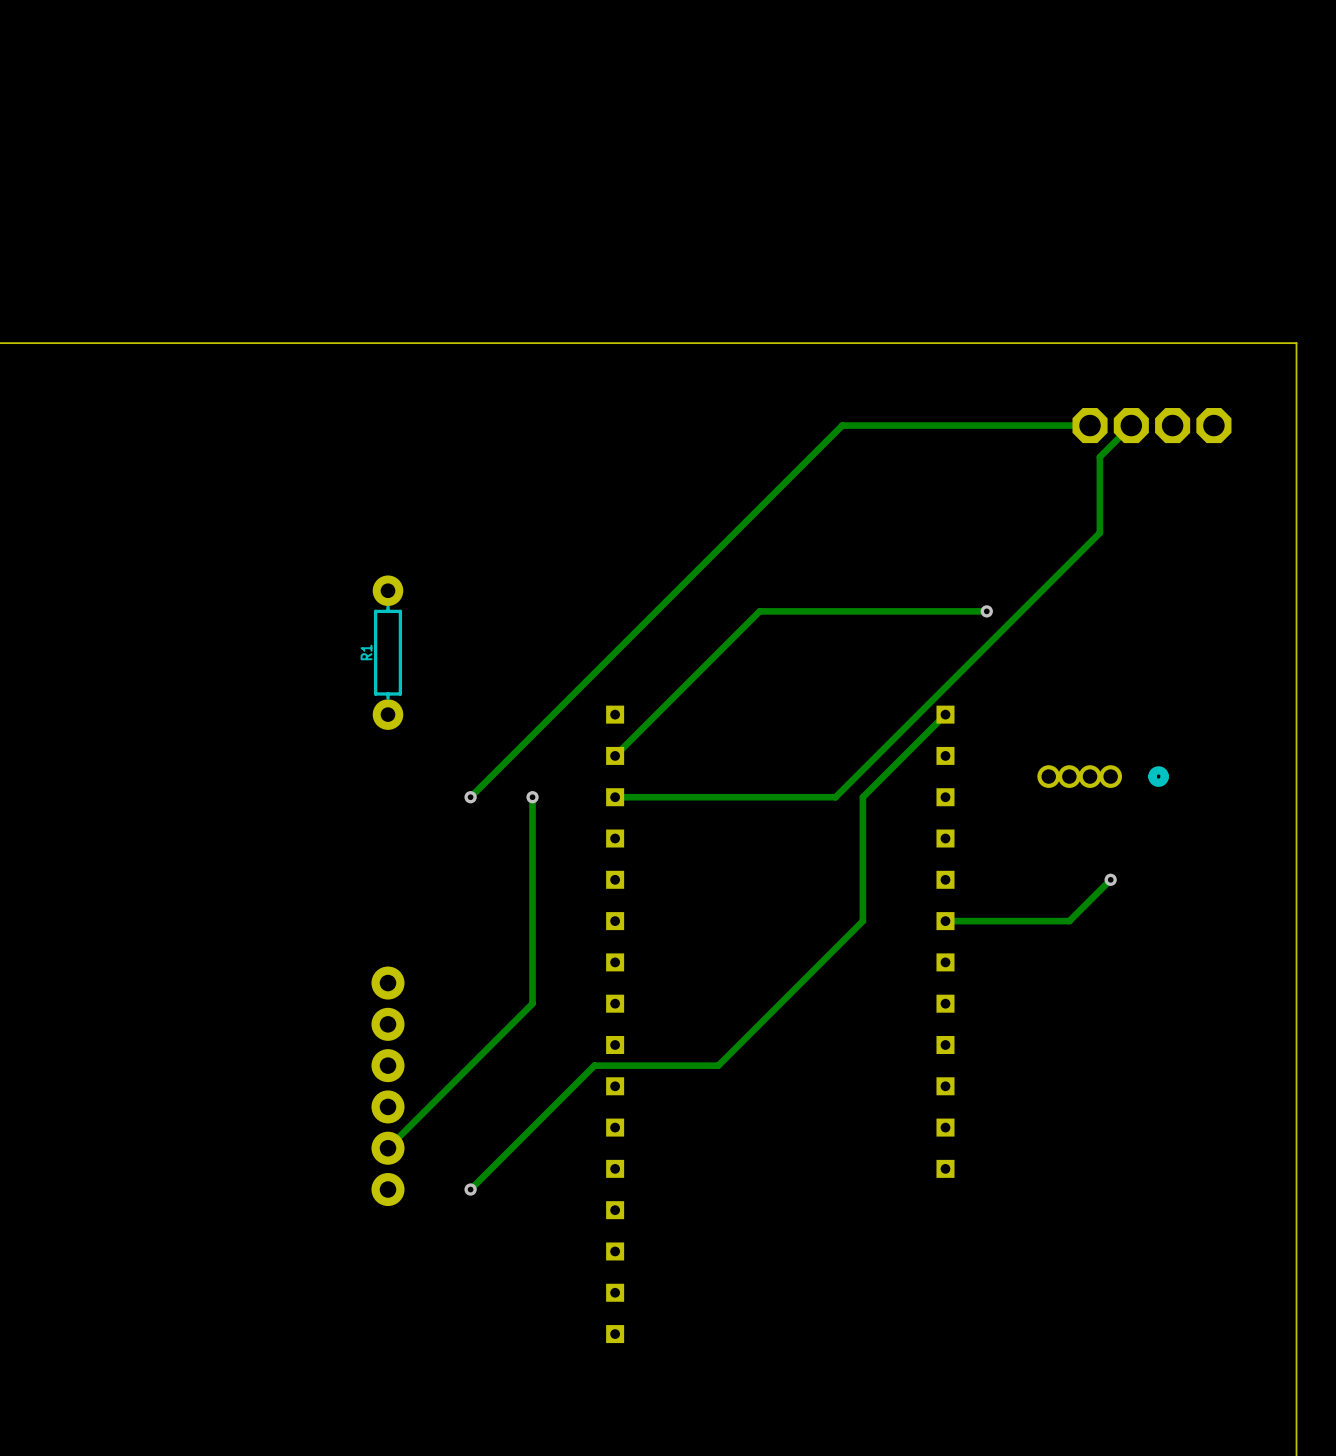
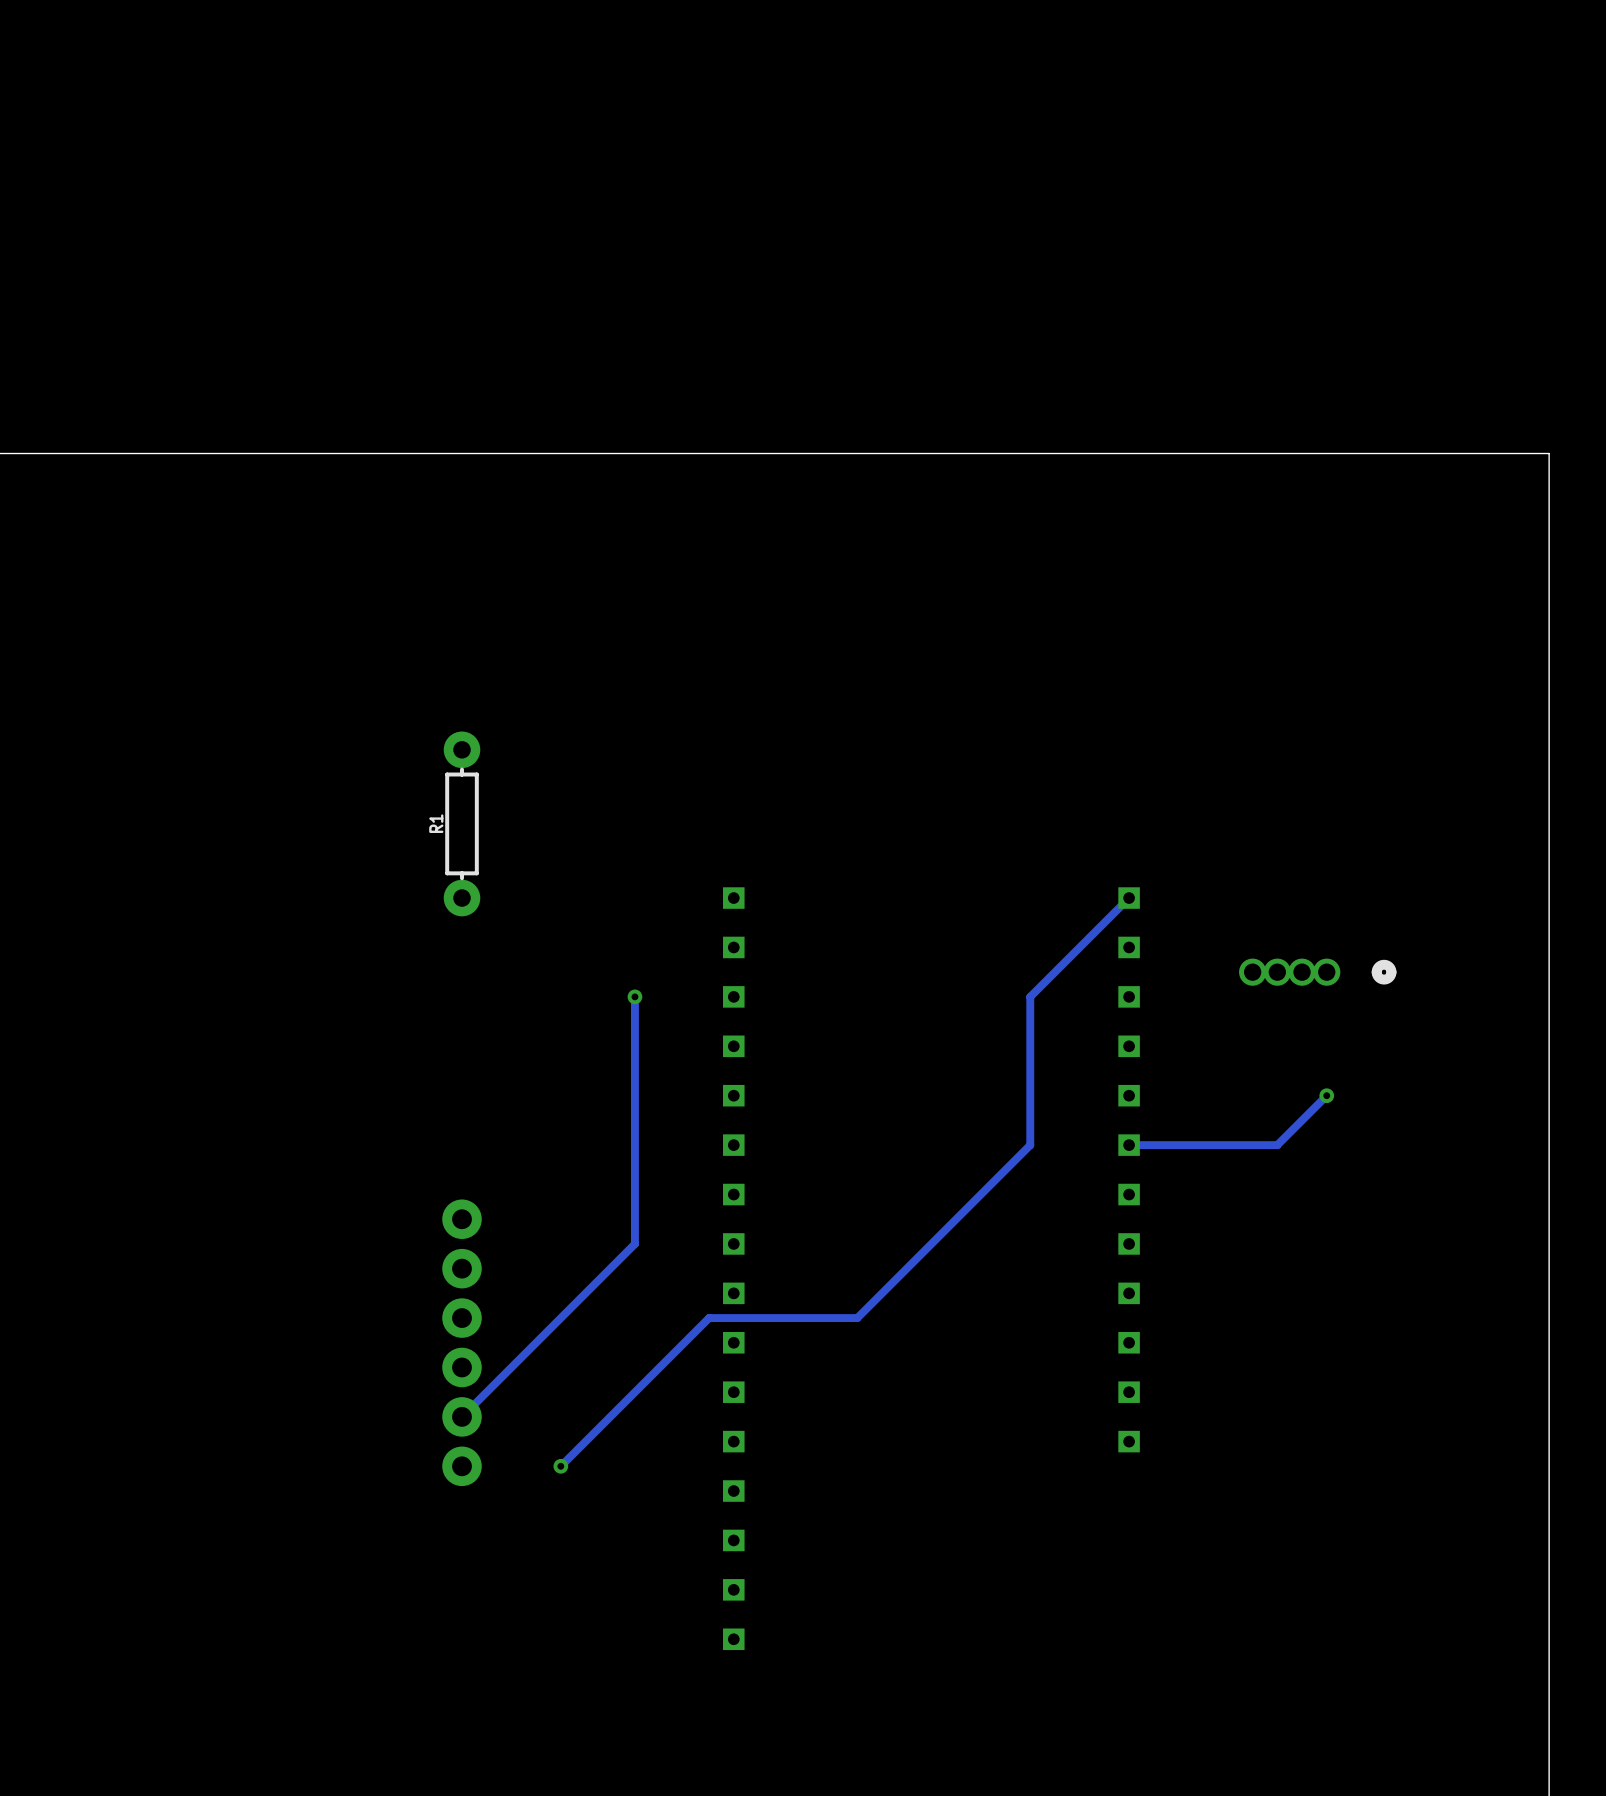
track: (1090, 425) (842, 425) (470, 797) -> none
part: (1090, 425) -> none
track: (1131, 425) (1099, 456) (1099, 532) (835, 797) (615, 797) -> none
part: (1131, 425) -> none
part: (1172, 425) -> none
part: (1213, 425) -> none
track: (986, 611) (759, 611) (615, 755) -> none
via: (986, 611) -> none
via: (470, 797) -> none

